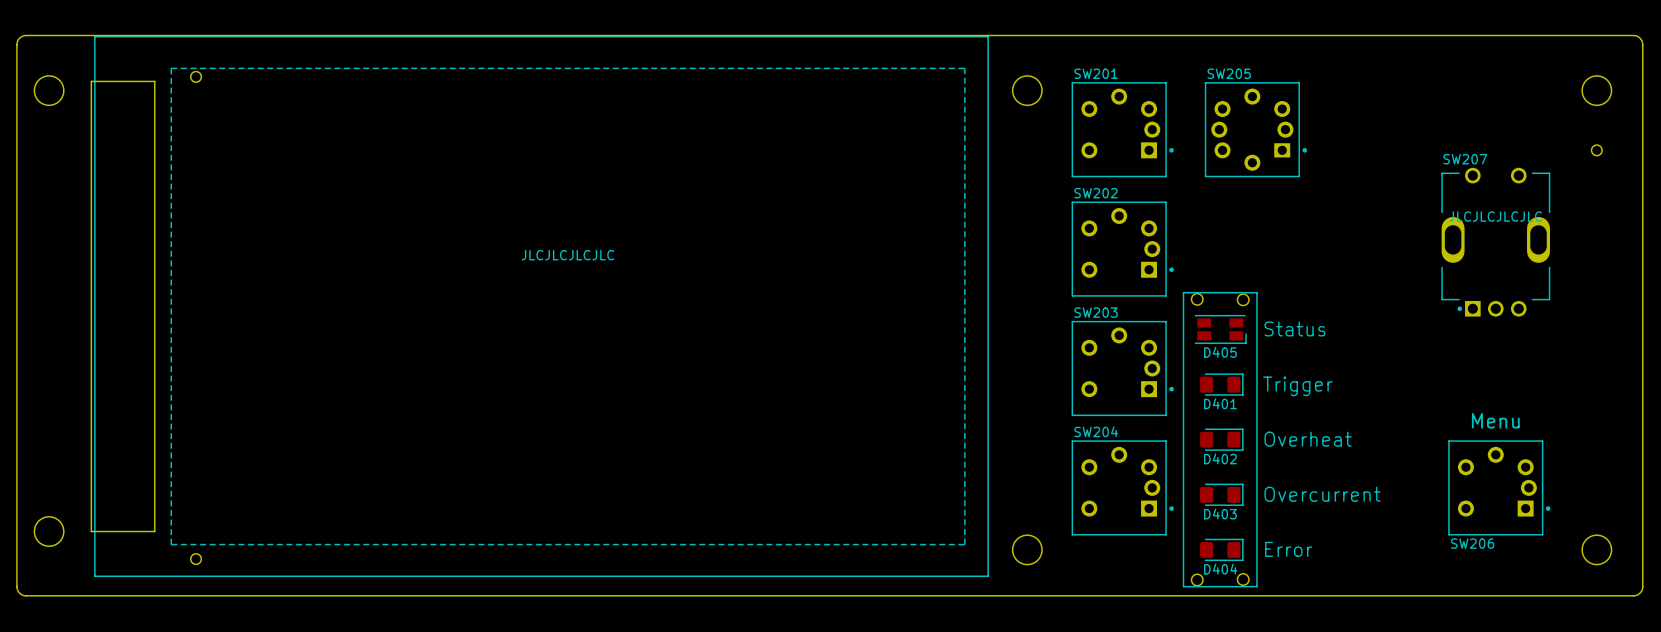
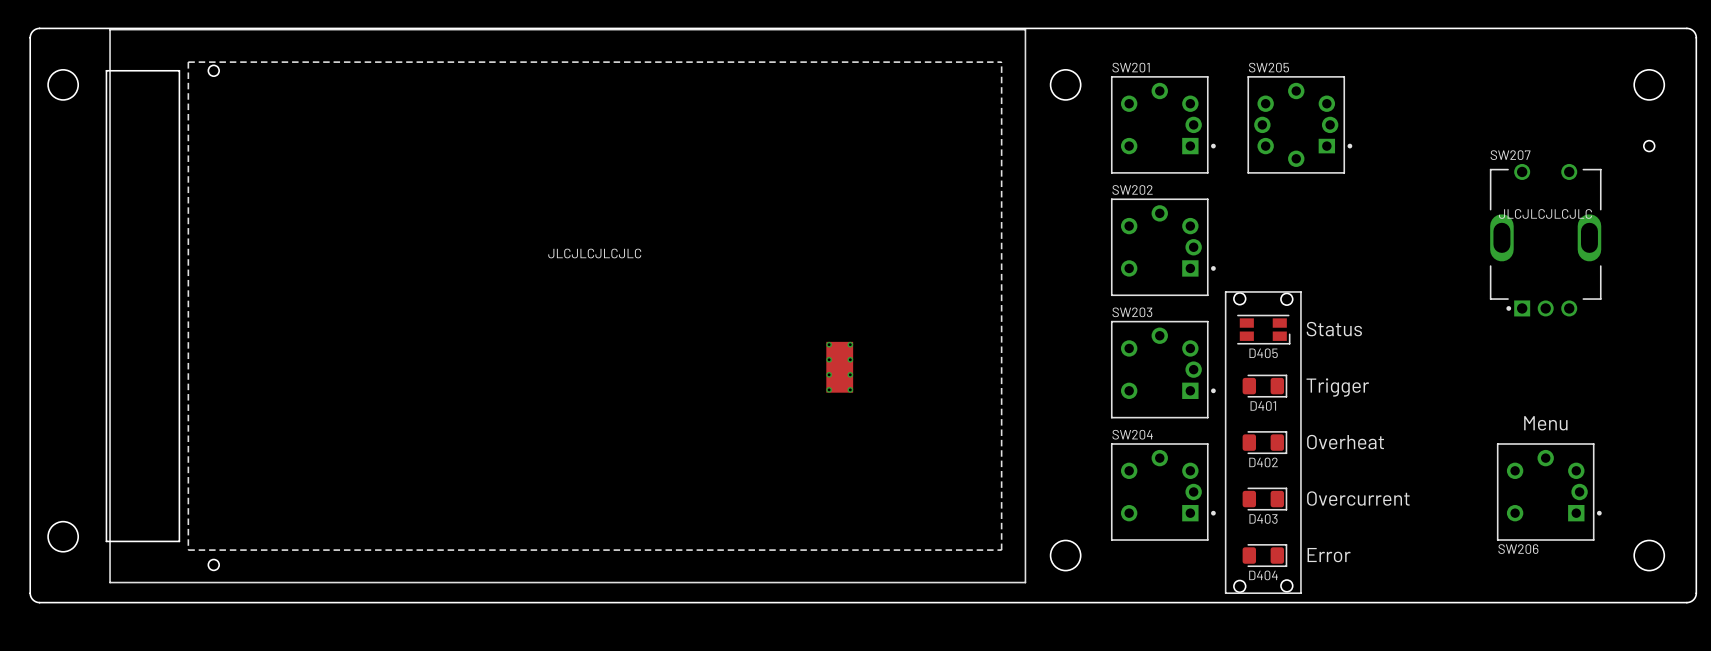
drawing shape: [90, 36, 989, 577] -> [105, 29, 1026, 584]
part: none -> (839, 367)

